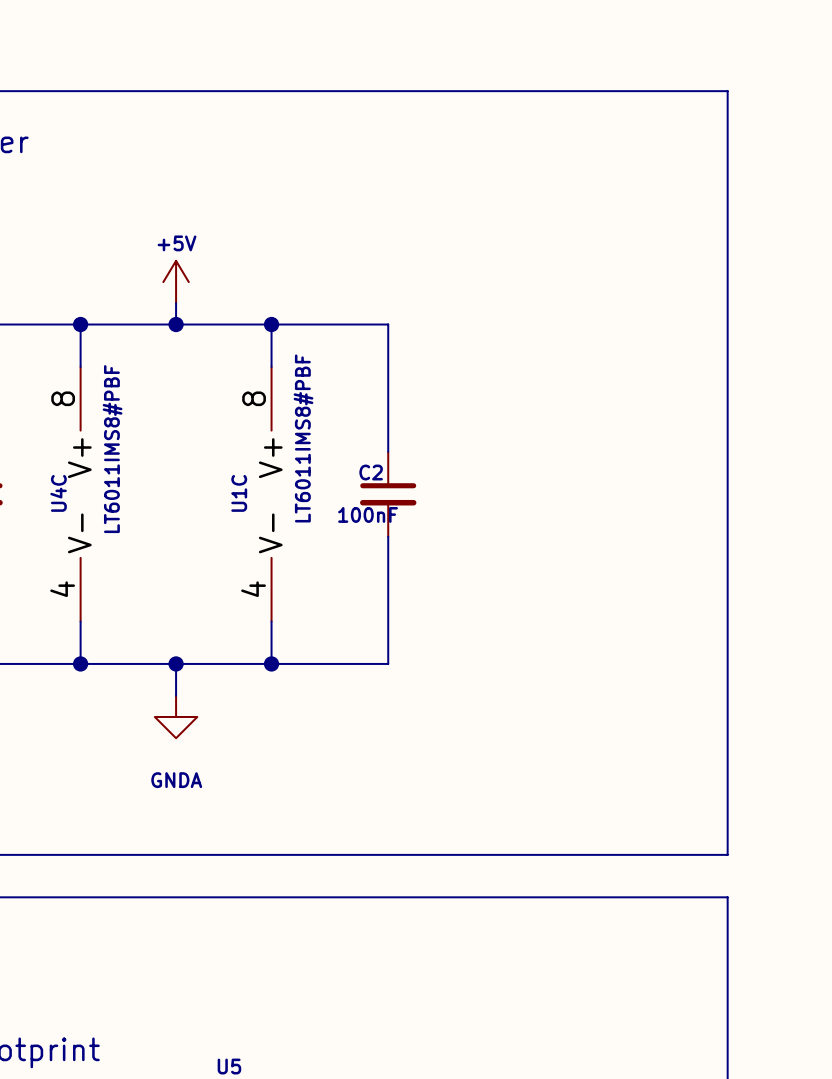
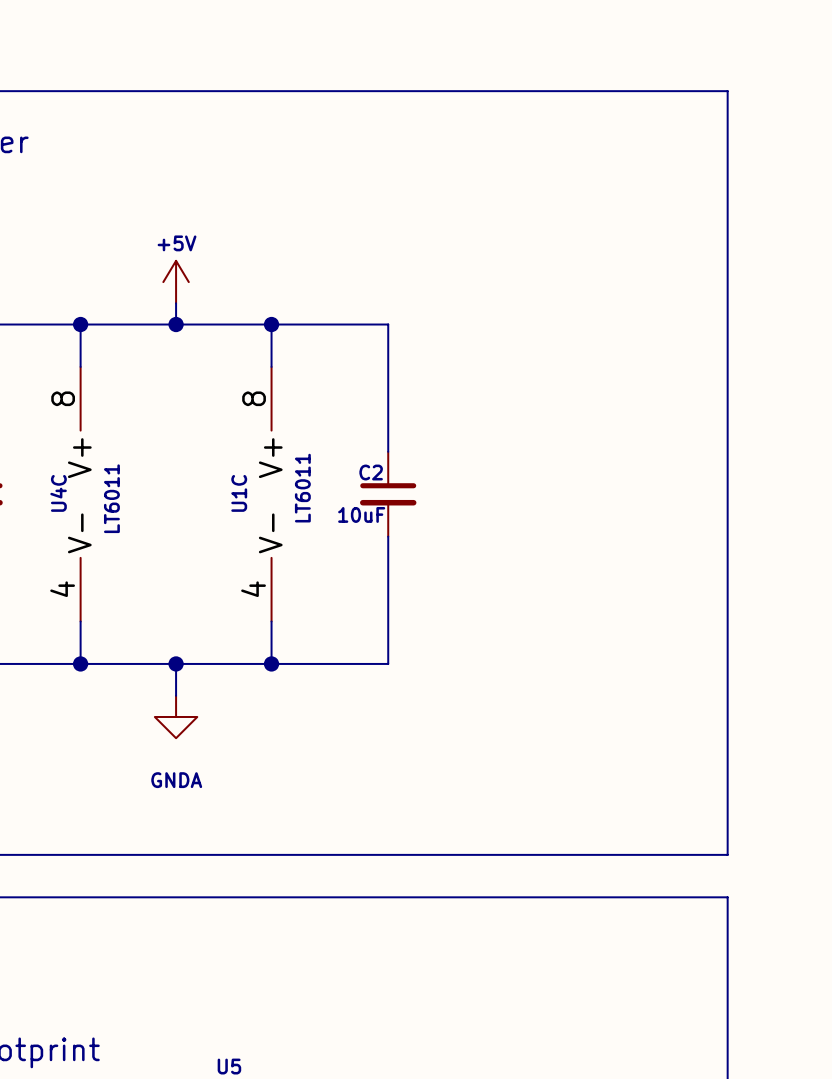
U1C value: LT6011IMS8#PBF (303, 438) -> LT6011 (302, 488)
U4C value: LT6011IMS8#PBF (112, 449) -> LT6011 (111, 498)
C2 value: 100nF (368, 514) -> 10uF (361, 514)

